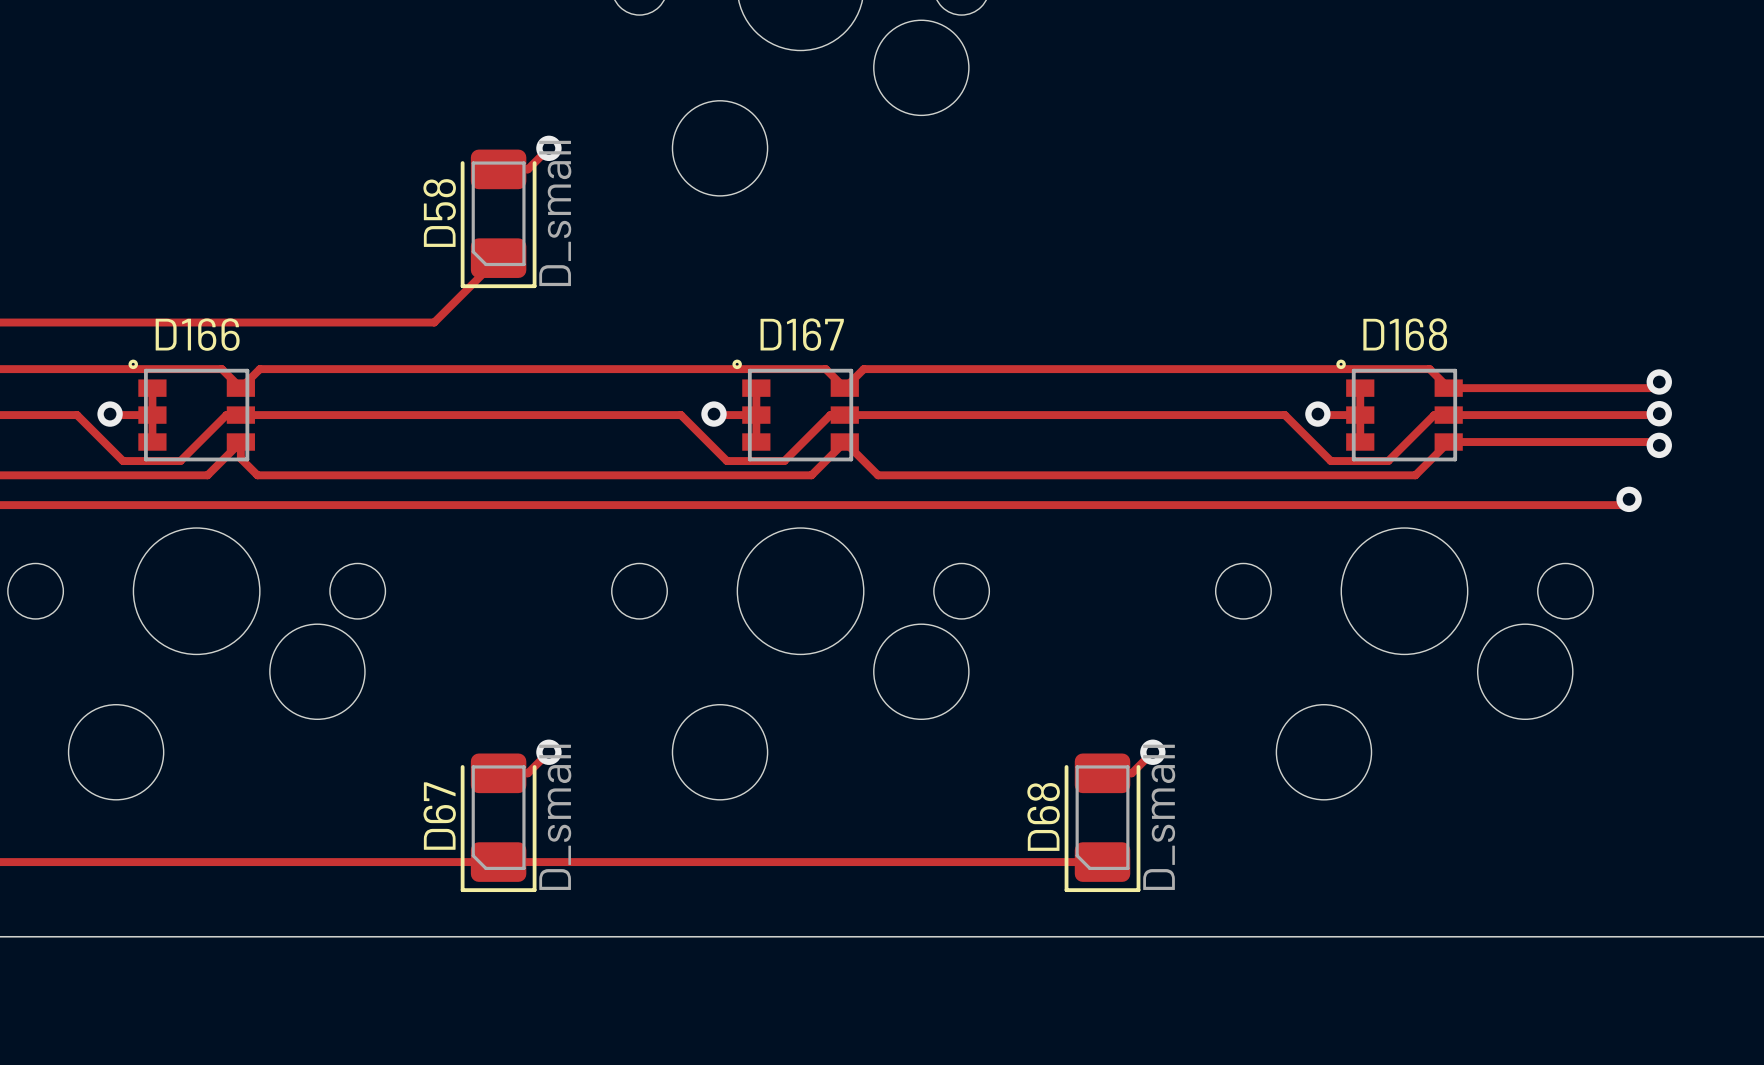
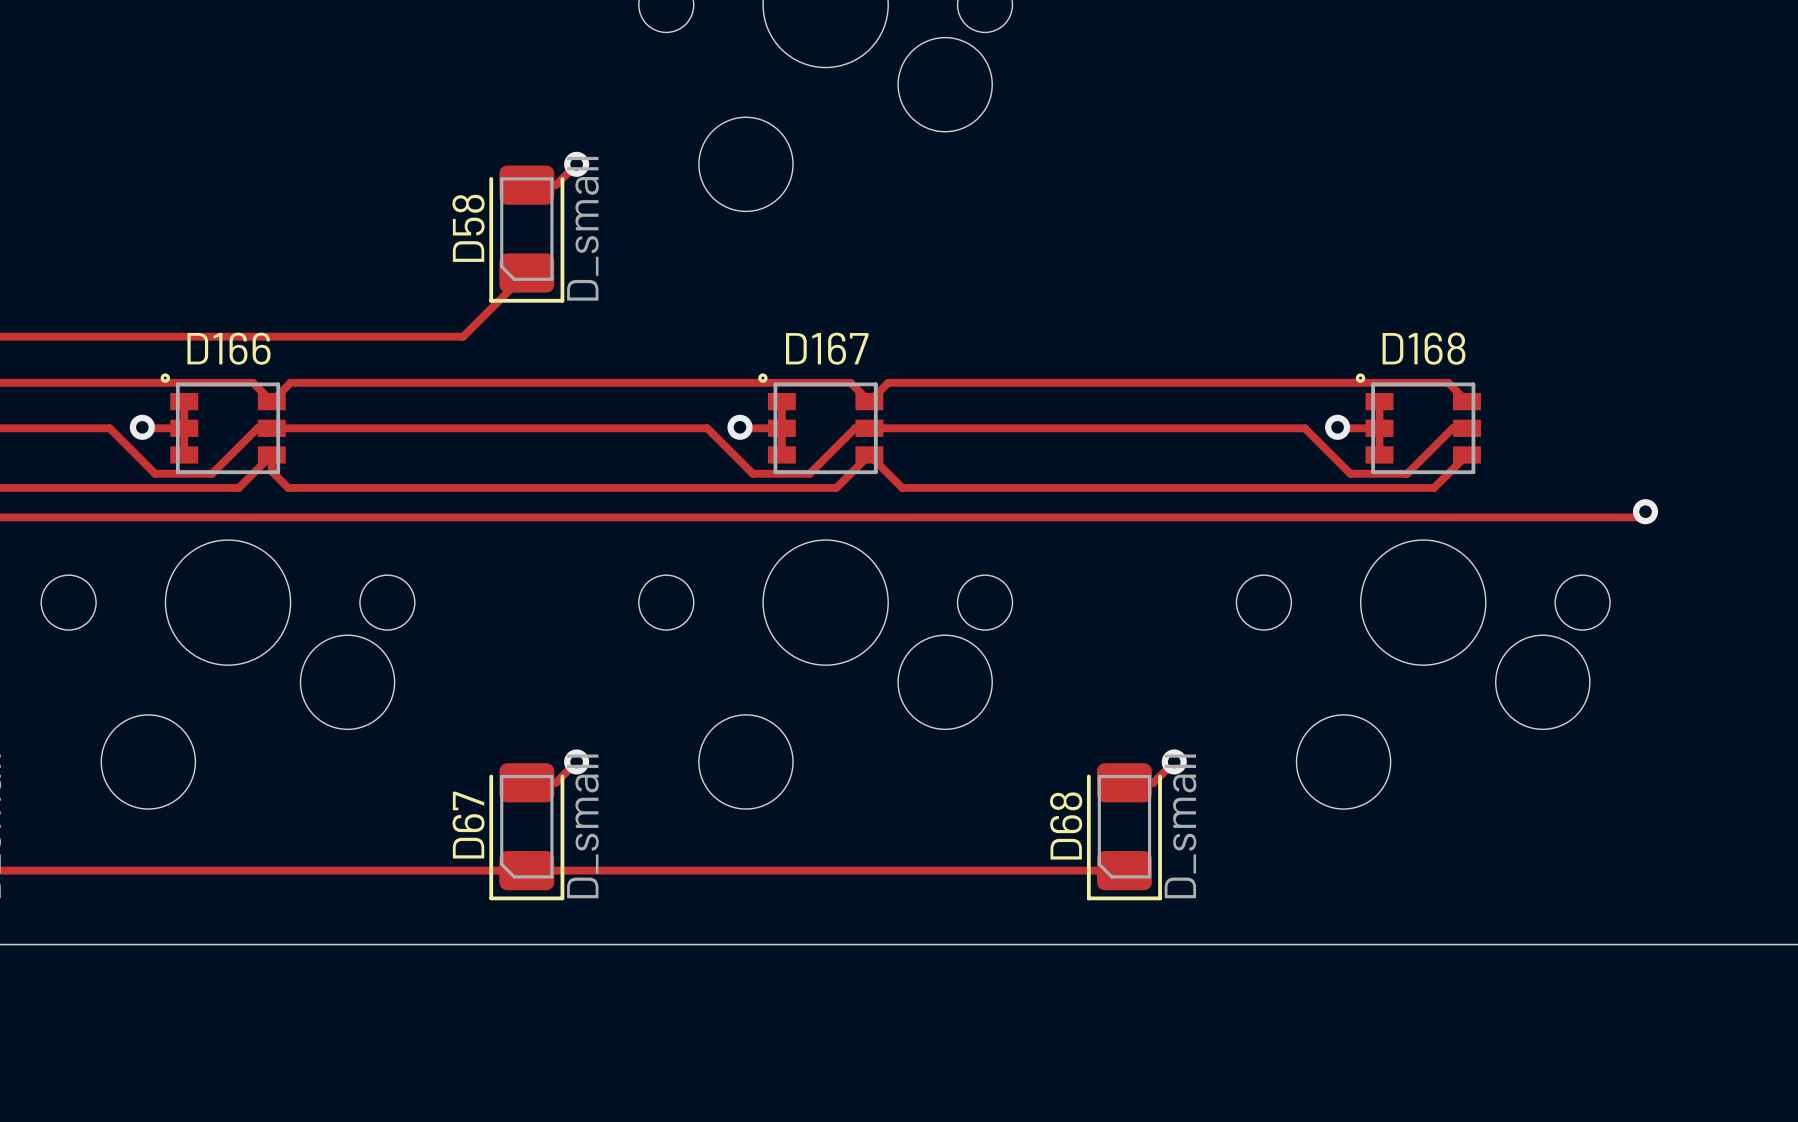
track: (1659, 381) (1653, 388) (1448, 388) -> none
via: (1659, 381) -> none
track: (1659, 413) (1448, 415) -> none
via: (1659, 413) -> none
track: (1448, 442) (1655, 442) (1659, 445) -> none
via: (1659, 445) -> none

